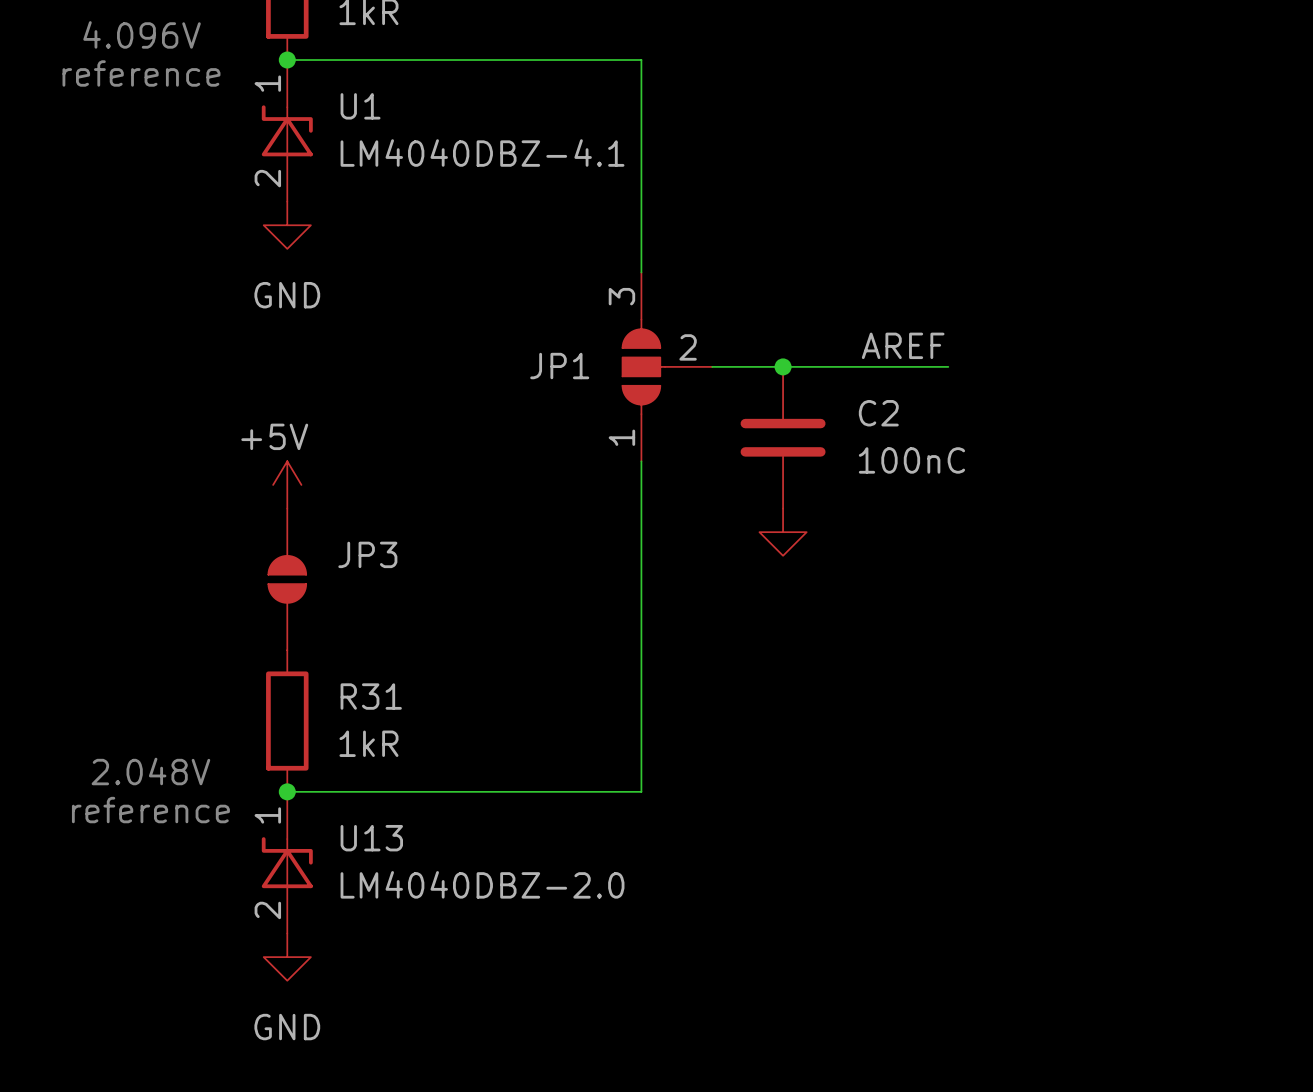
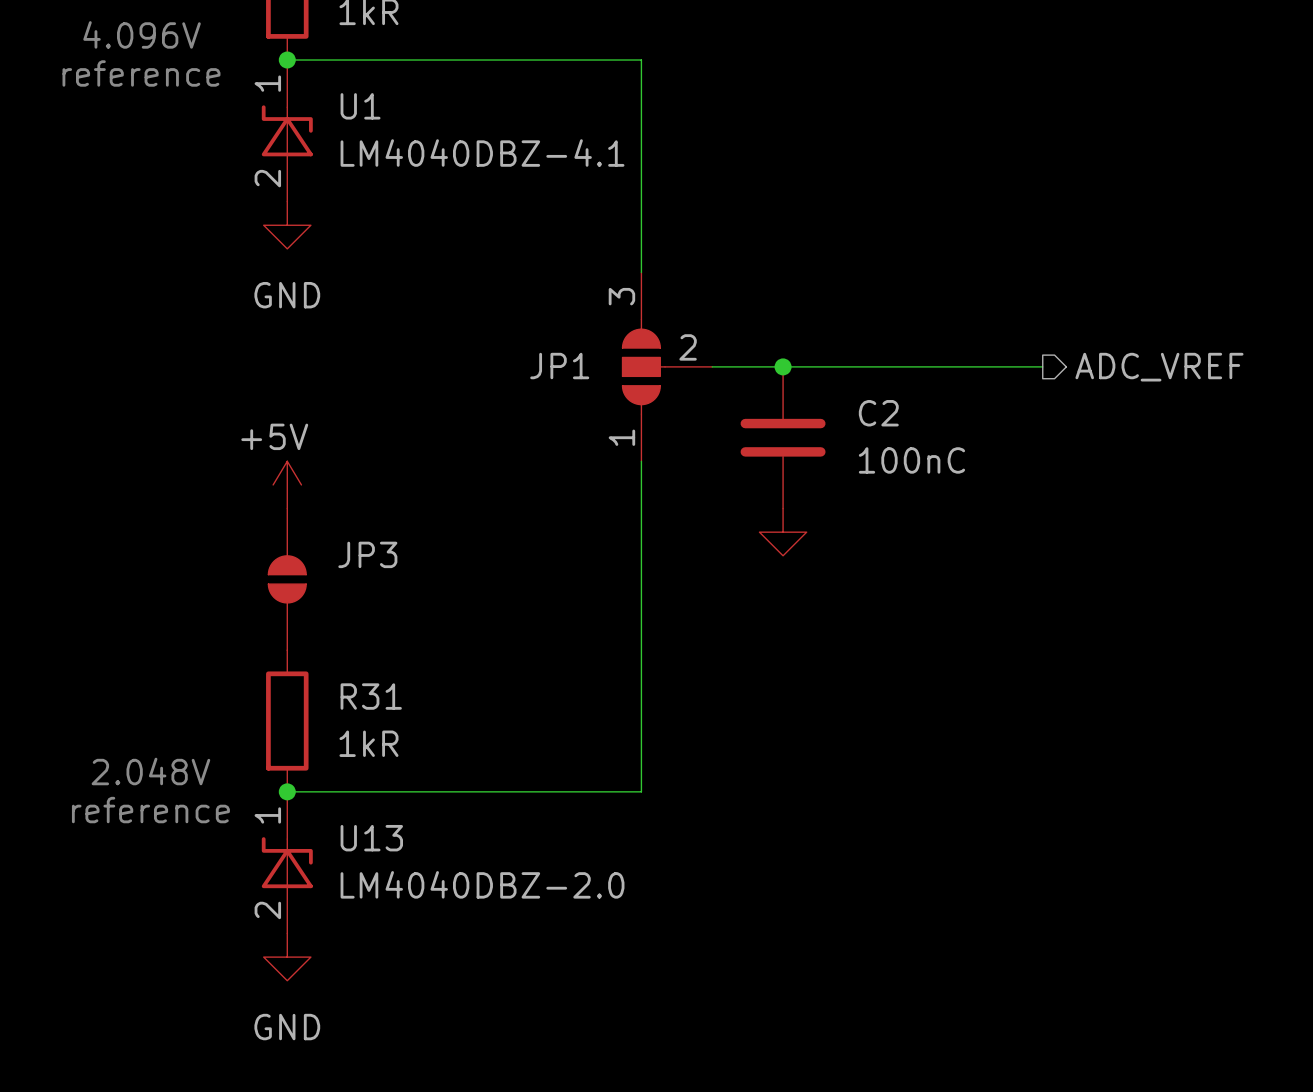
label: AREF (903, 345) -> none
wire: none -> (948, 366) (1042, 366)
hierarchical label: none -> ADC_VREF (1159, 367)

